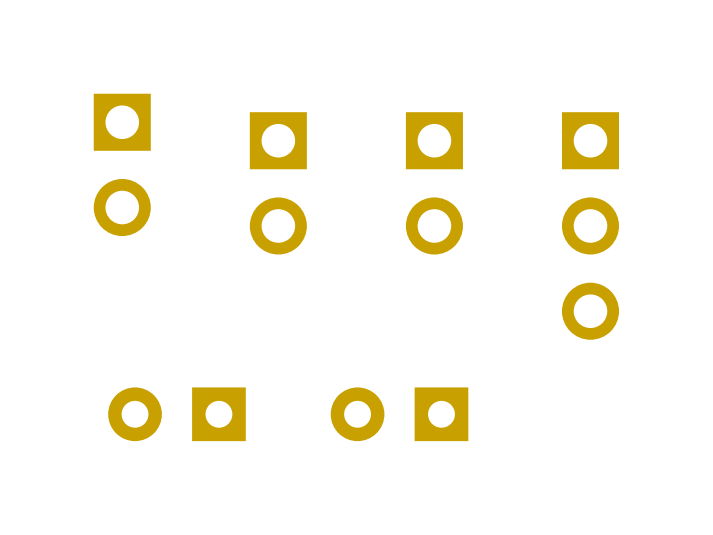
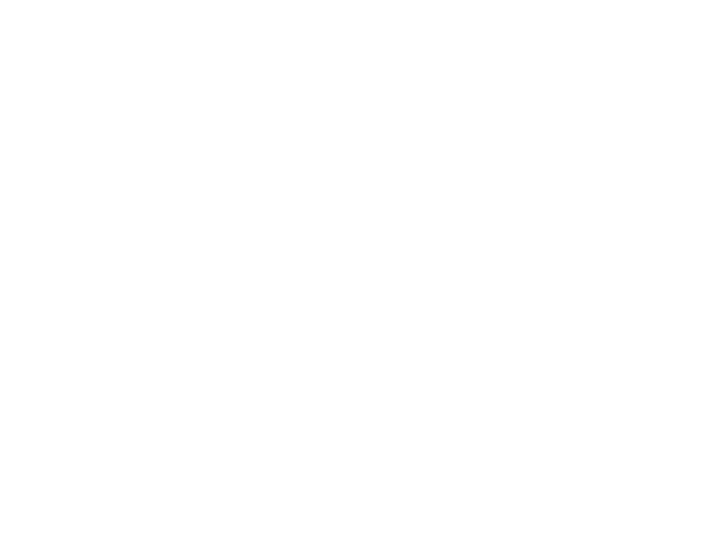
part: (122, 164) -> none
part: (278, 183) -> none
part: (434, 183) -> none
part: (590, 225) -> none
part: (176, 414) -> none
part: (399, 414) -> none

